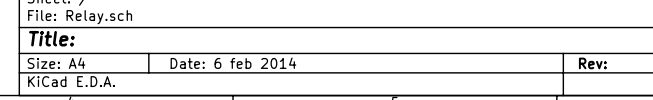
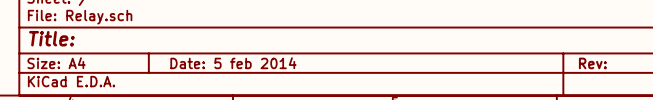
title block: Date: 6 feb 2014 (233, 63) -> Date: 5 feb 2014 (233, 63)

